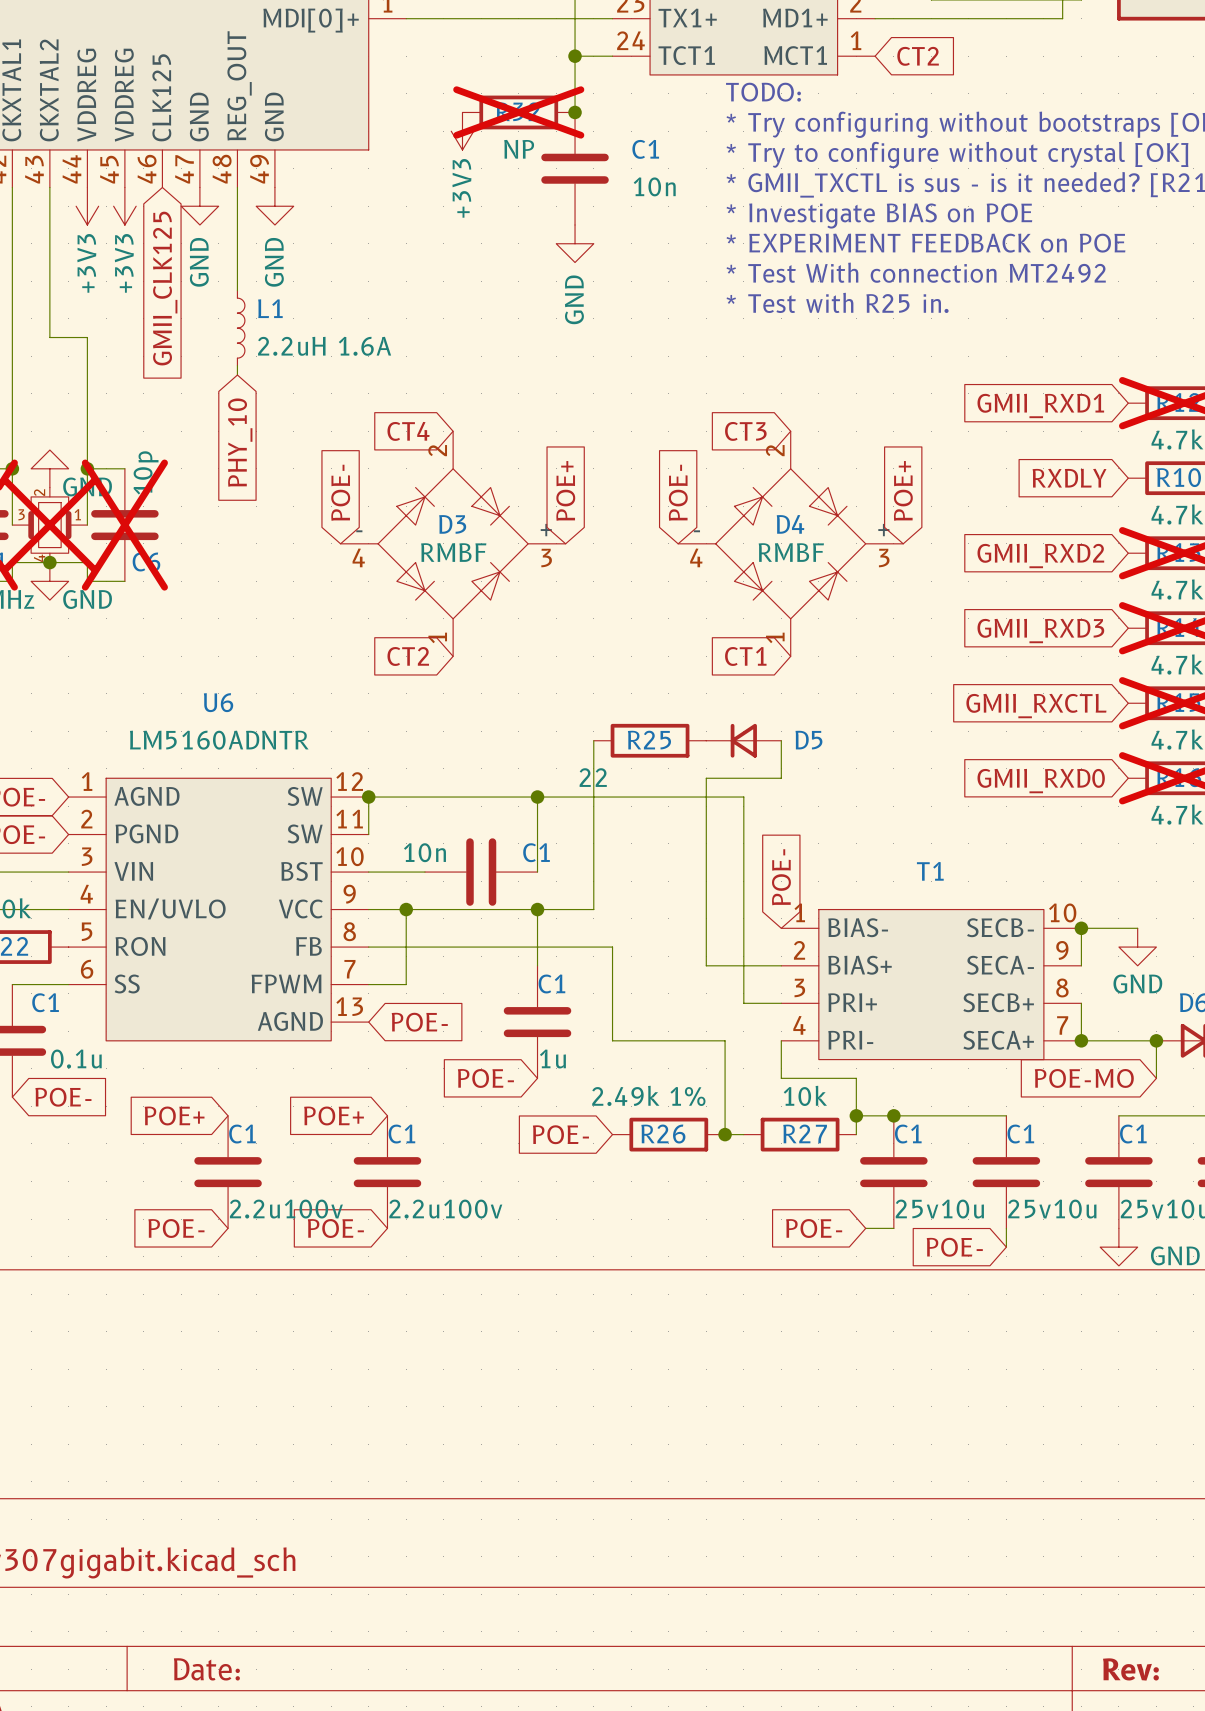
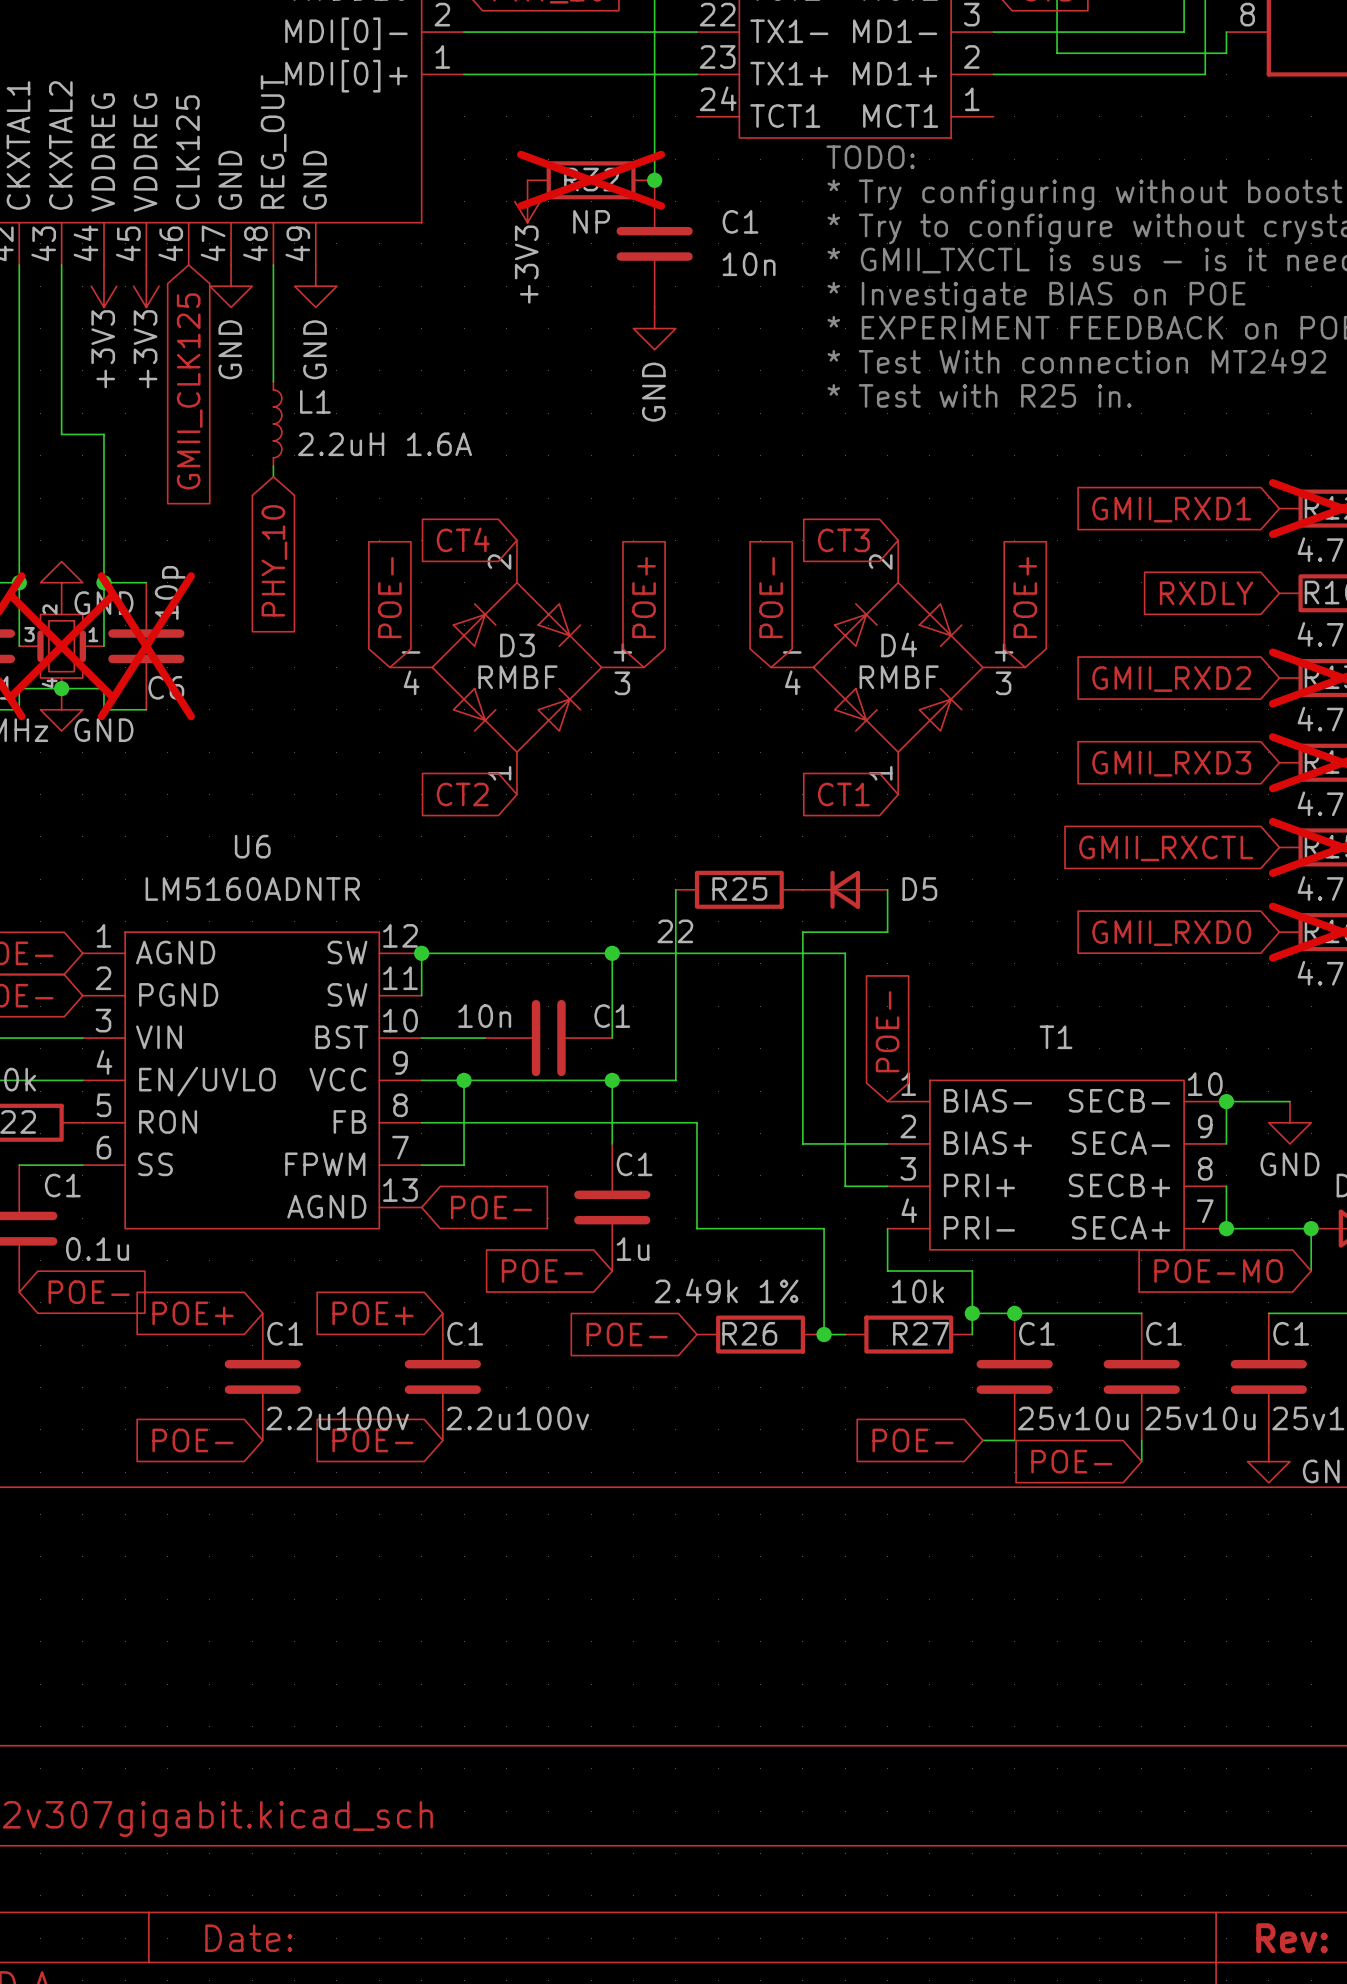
wire: (575, 56) (612, 56) -> none
junction: (575, 56) -> none
global label: CT2 (918, 56) -> none

